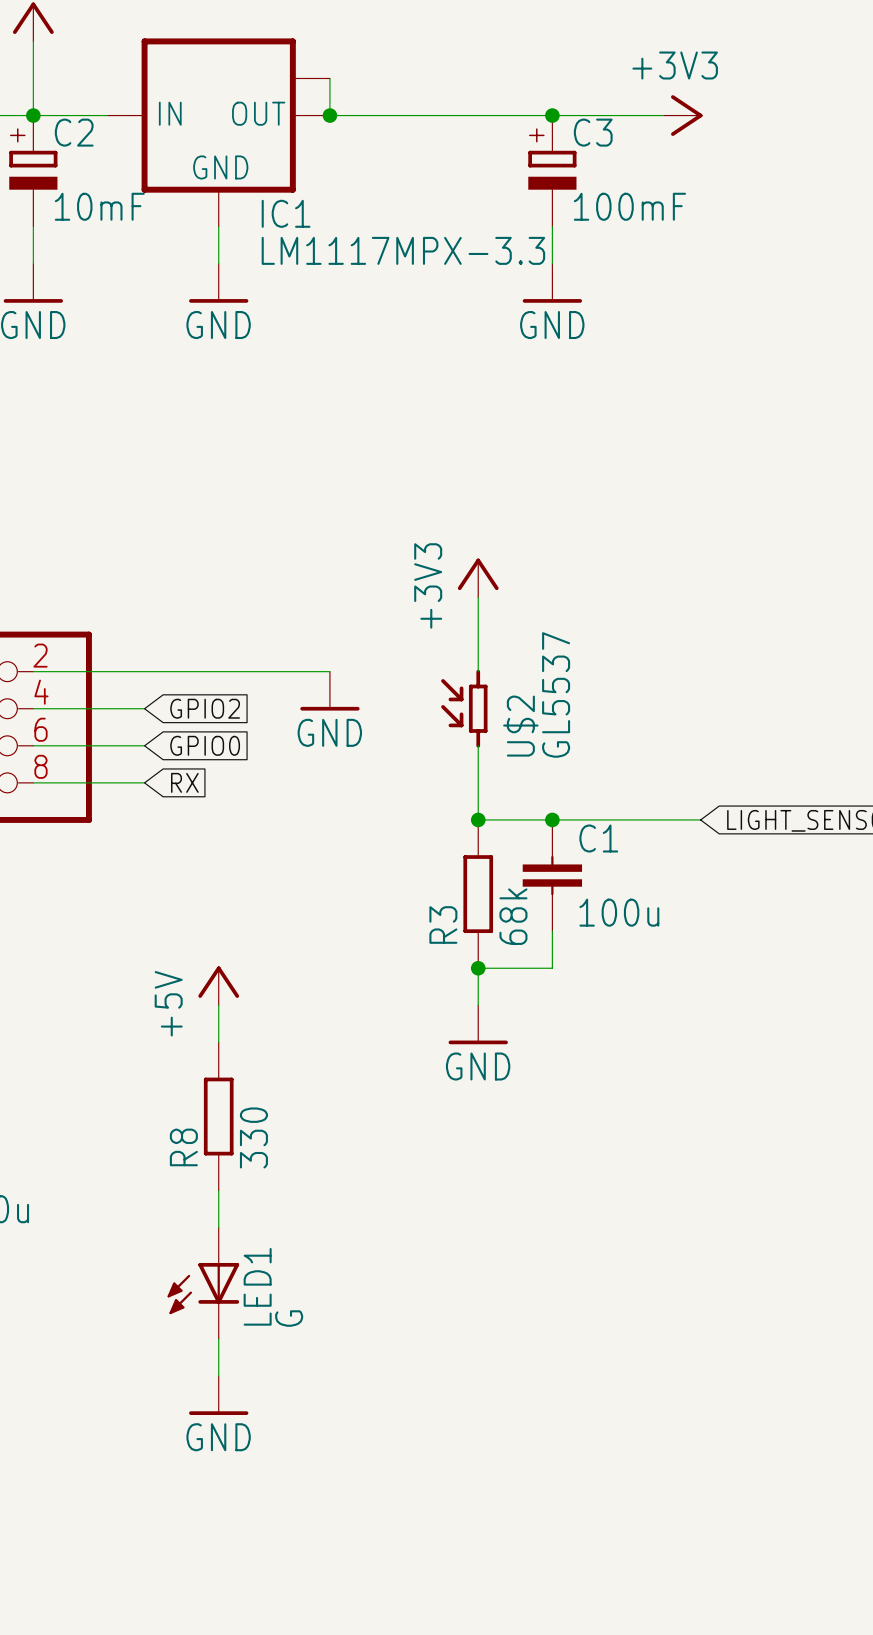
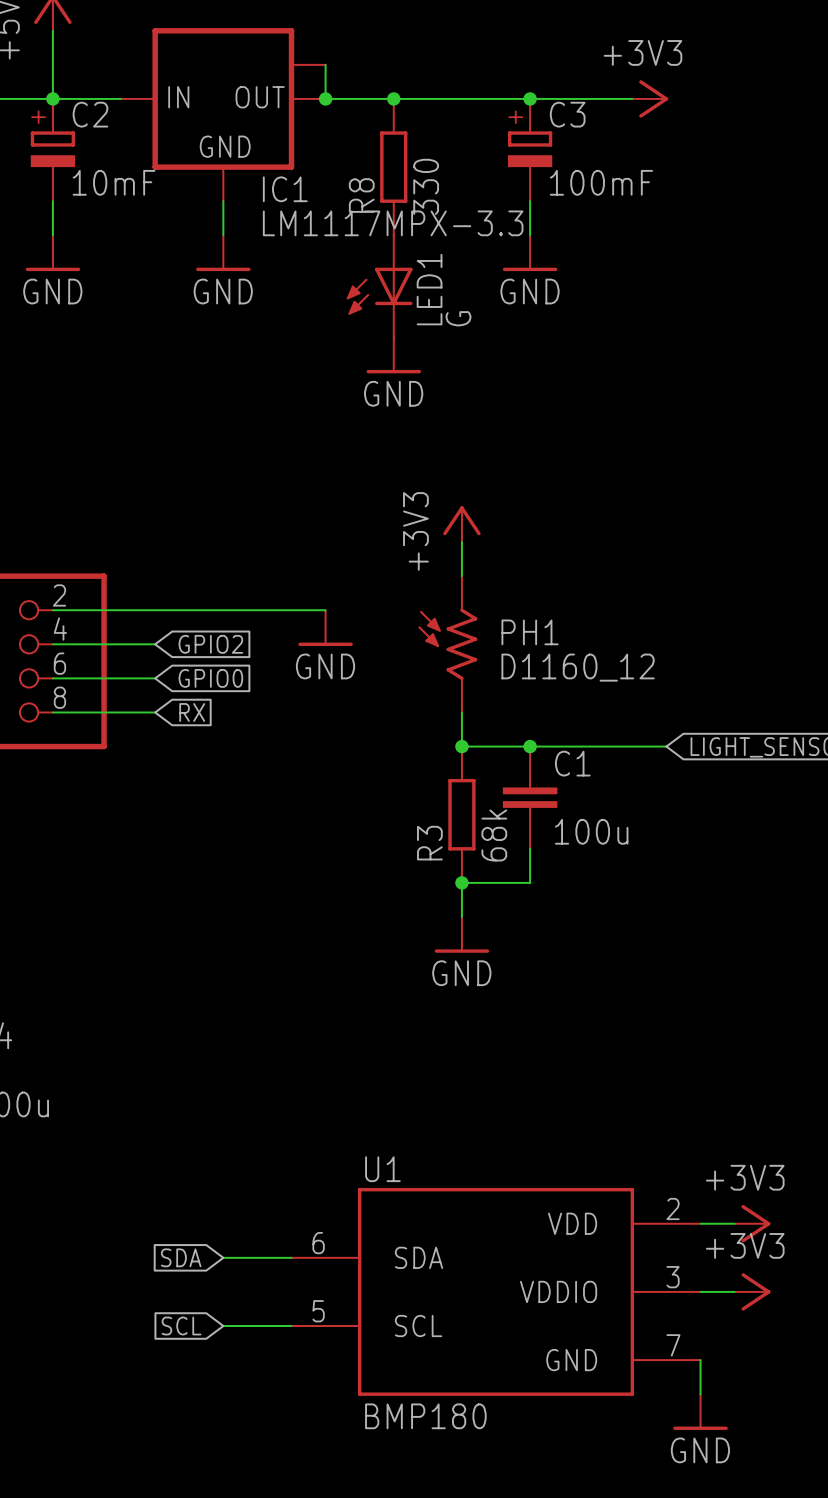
junction: none -> (393, 98)
power symbol: none -> GND (393, 355)
PH1: none -> D1160_12 (447, 644)
U$2: GL5537 (464, 708) -> none
power symbol: +5V (218, 985) -> none
wire: (218, 1005) (218, 1042) -> none
R8 position: (218, 1116) -> (393, 167)
wire: (218, 1190) (218, 1227) -> none
LED1 position: (203, 1283) -> (379, 286)
wire: (218, 1338) (218, 1376) -> (291, 1257) (223, 1257)
wire: none -> (700, 1223) (734, 1223)
power symbol: none -> +3V3 (752, 1223)
global label: none -> SDA (181, 1257)
power symbol: GND (218, 1395) -> none
U1: none -> BMP180 (496, 1291)
wire: none -> (700, 1291) (734, 1291)
power symbol: none -> +3V3 (752, 1291)
global label: none -> SCL (181, 1326)
wire: none -> (223, 1326) (291, 1326)
wire: none -> (700, 1360) (700, 1394)
power symbol: none -> GND (700, 1412)

